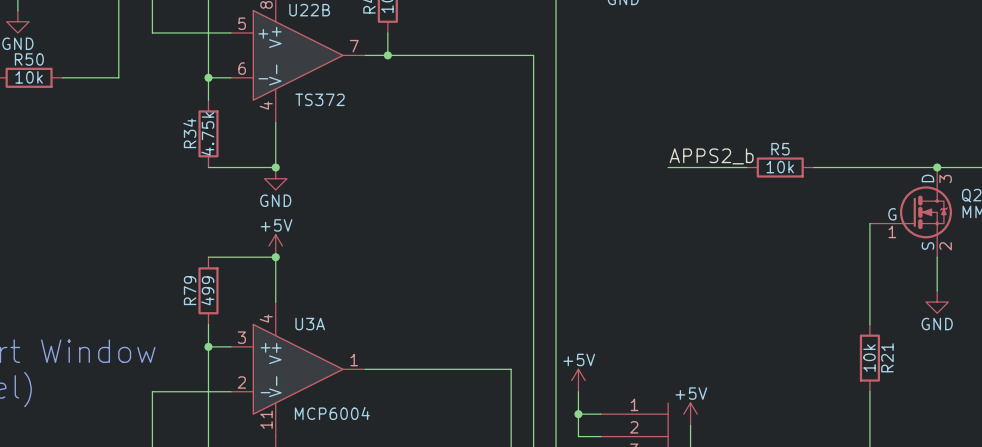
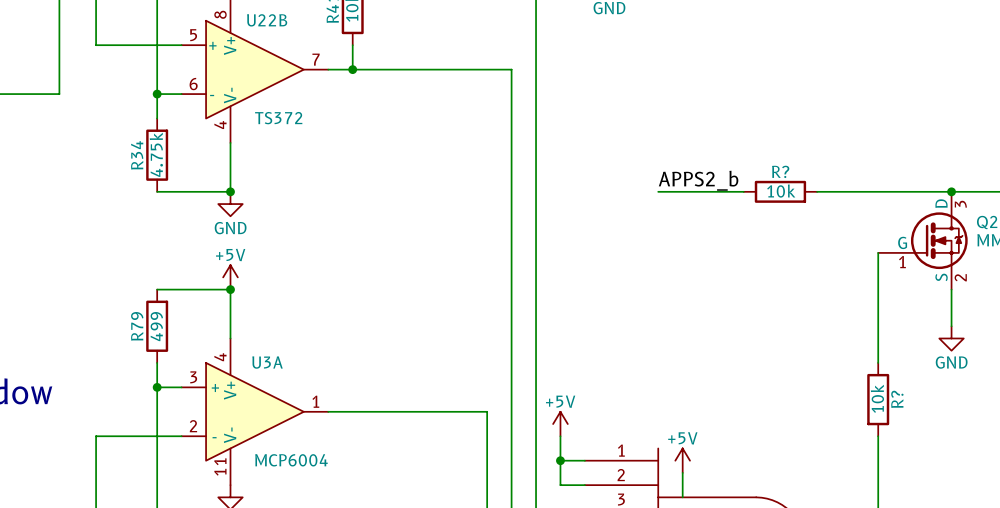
R5 name: R5 (780, 149) -> R? (780, 171)
R21 name: R21 (887, 357) -> R? (897, 399)

